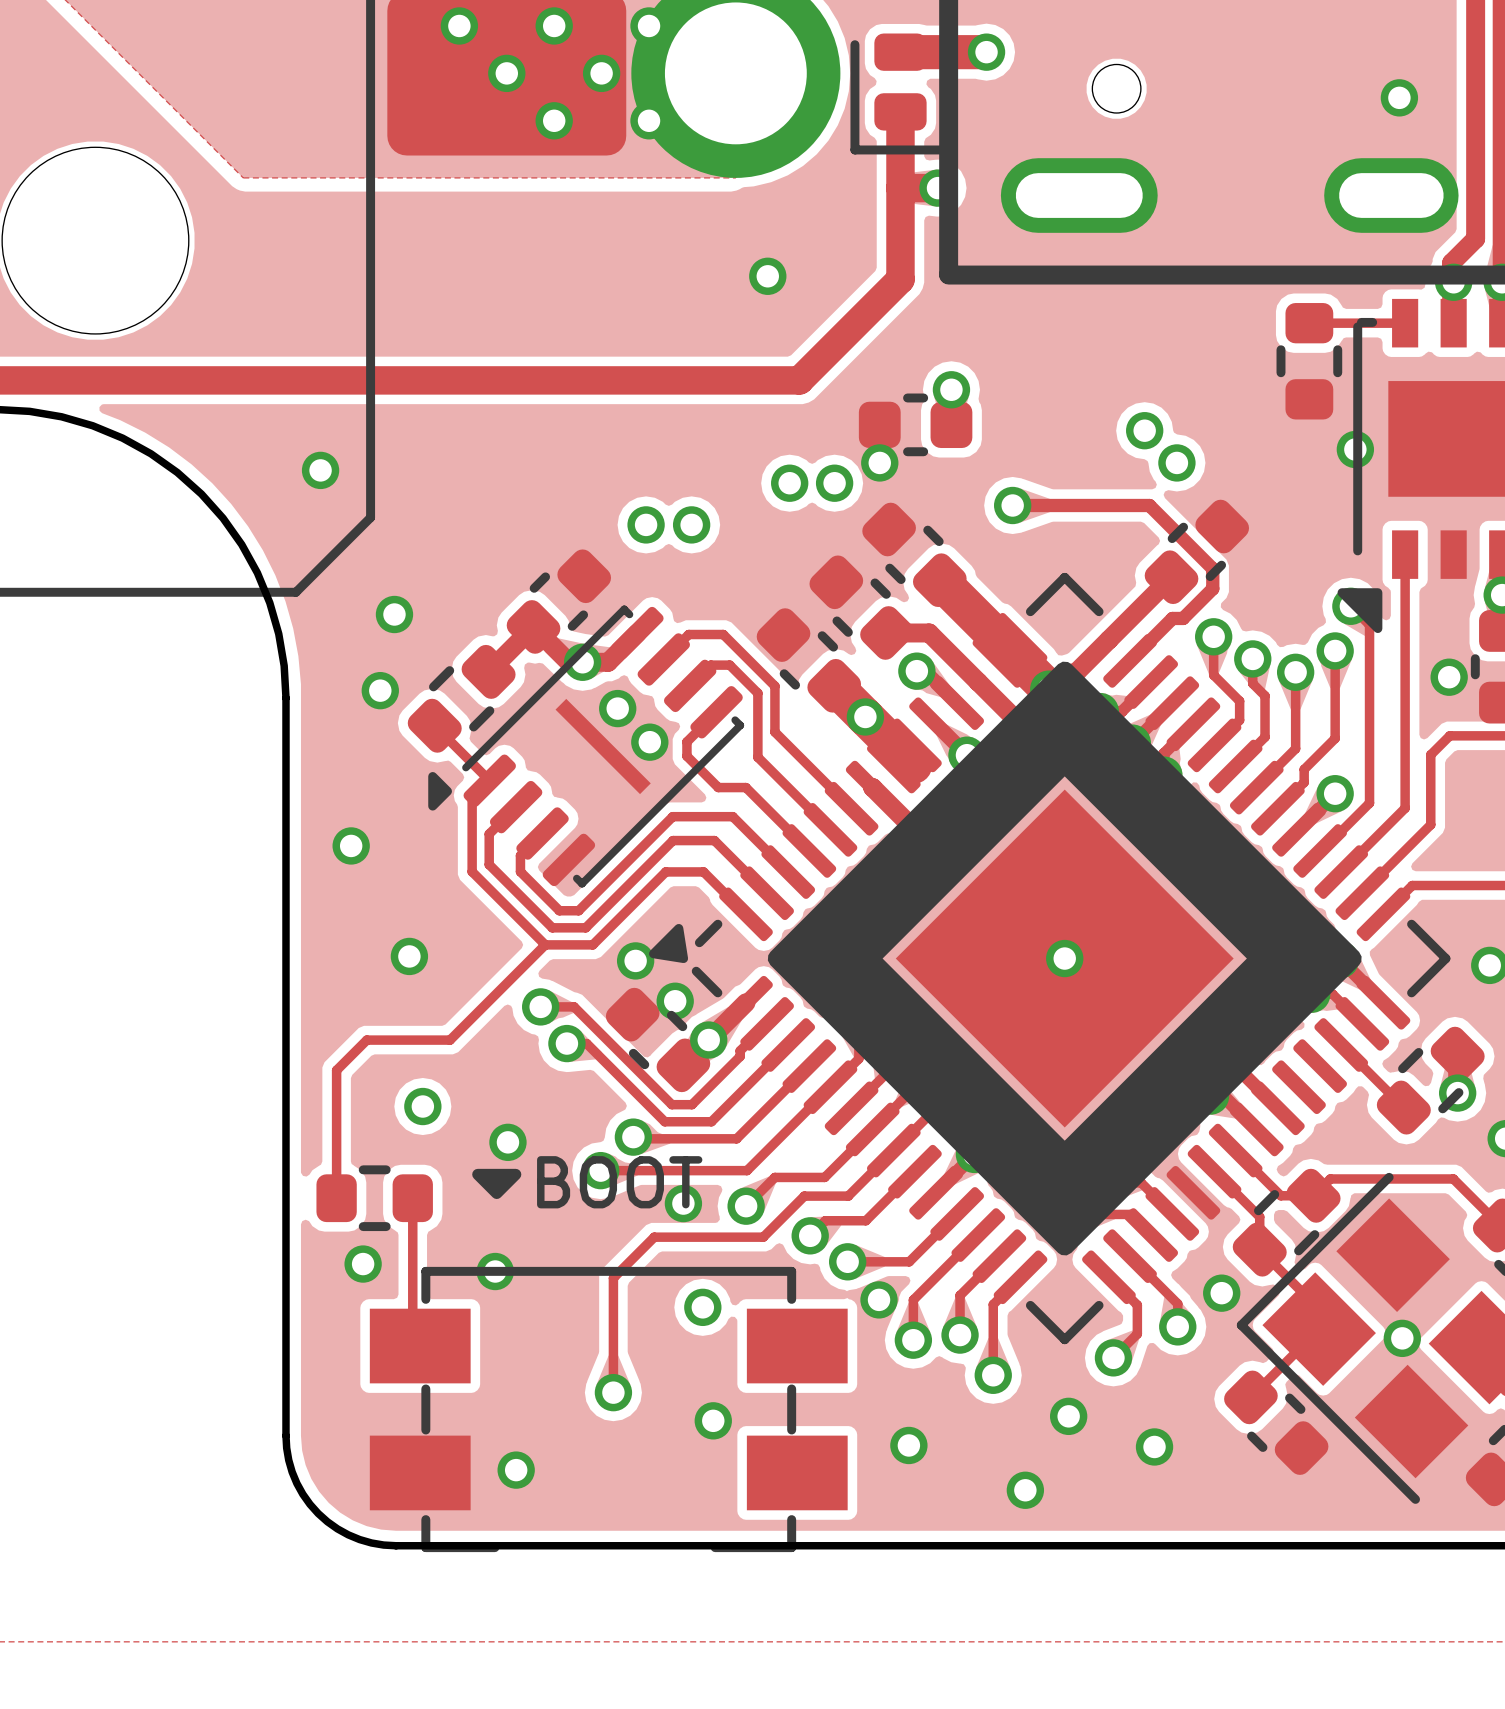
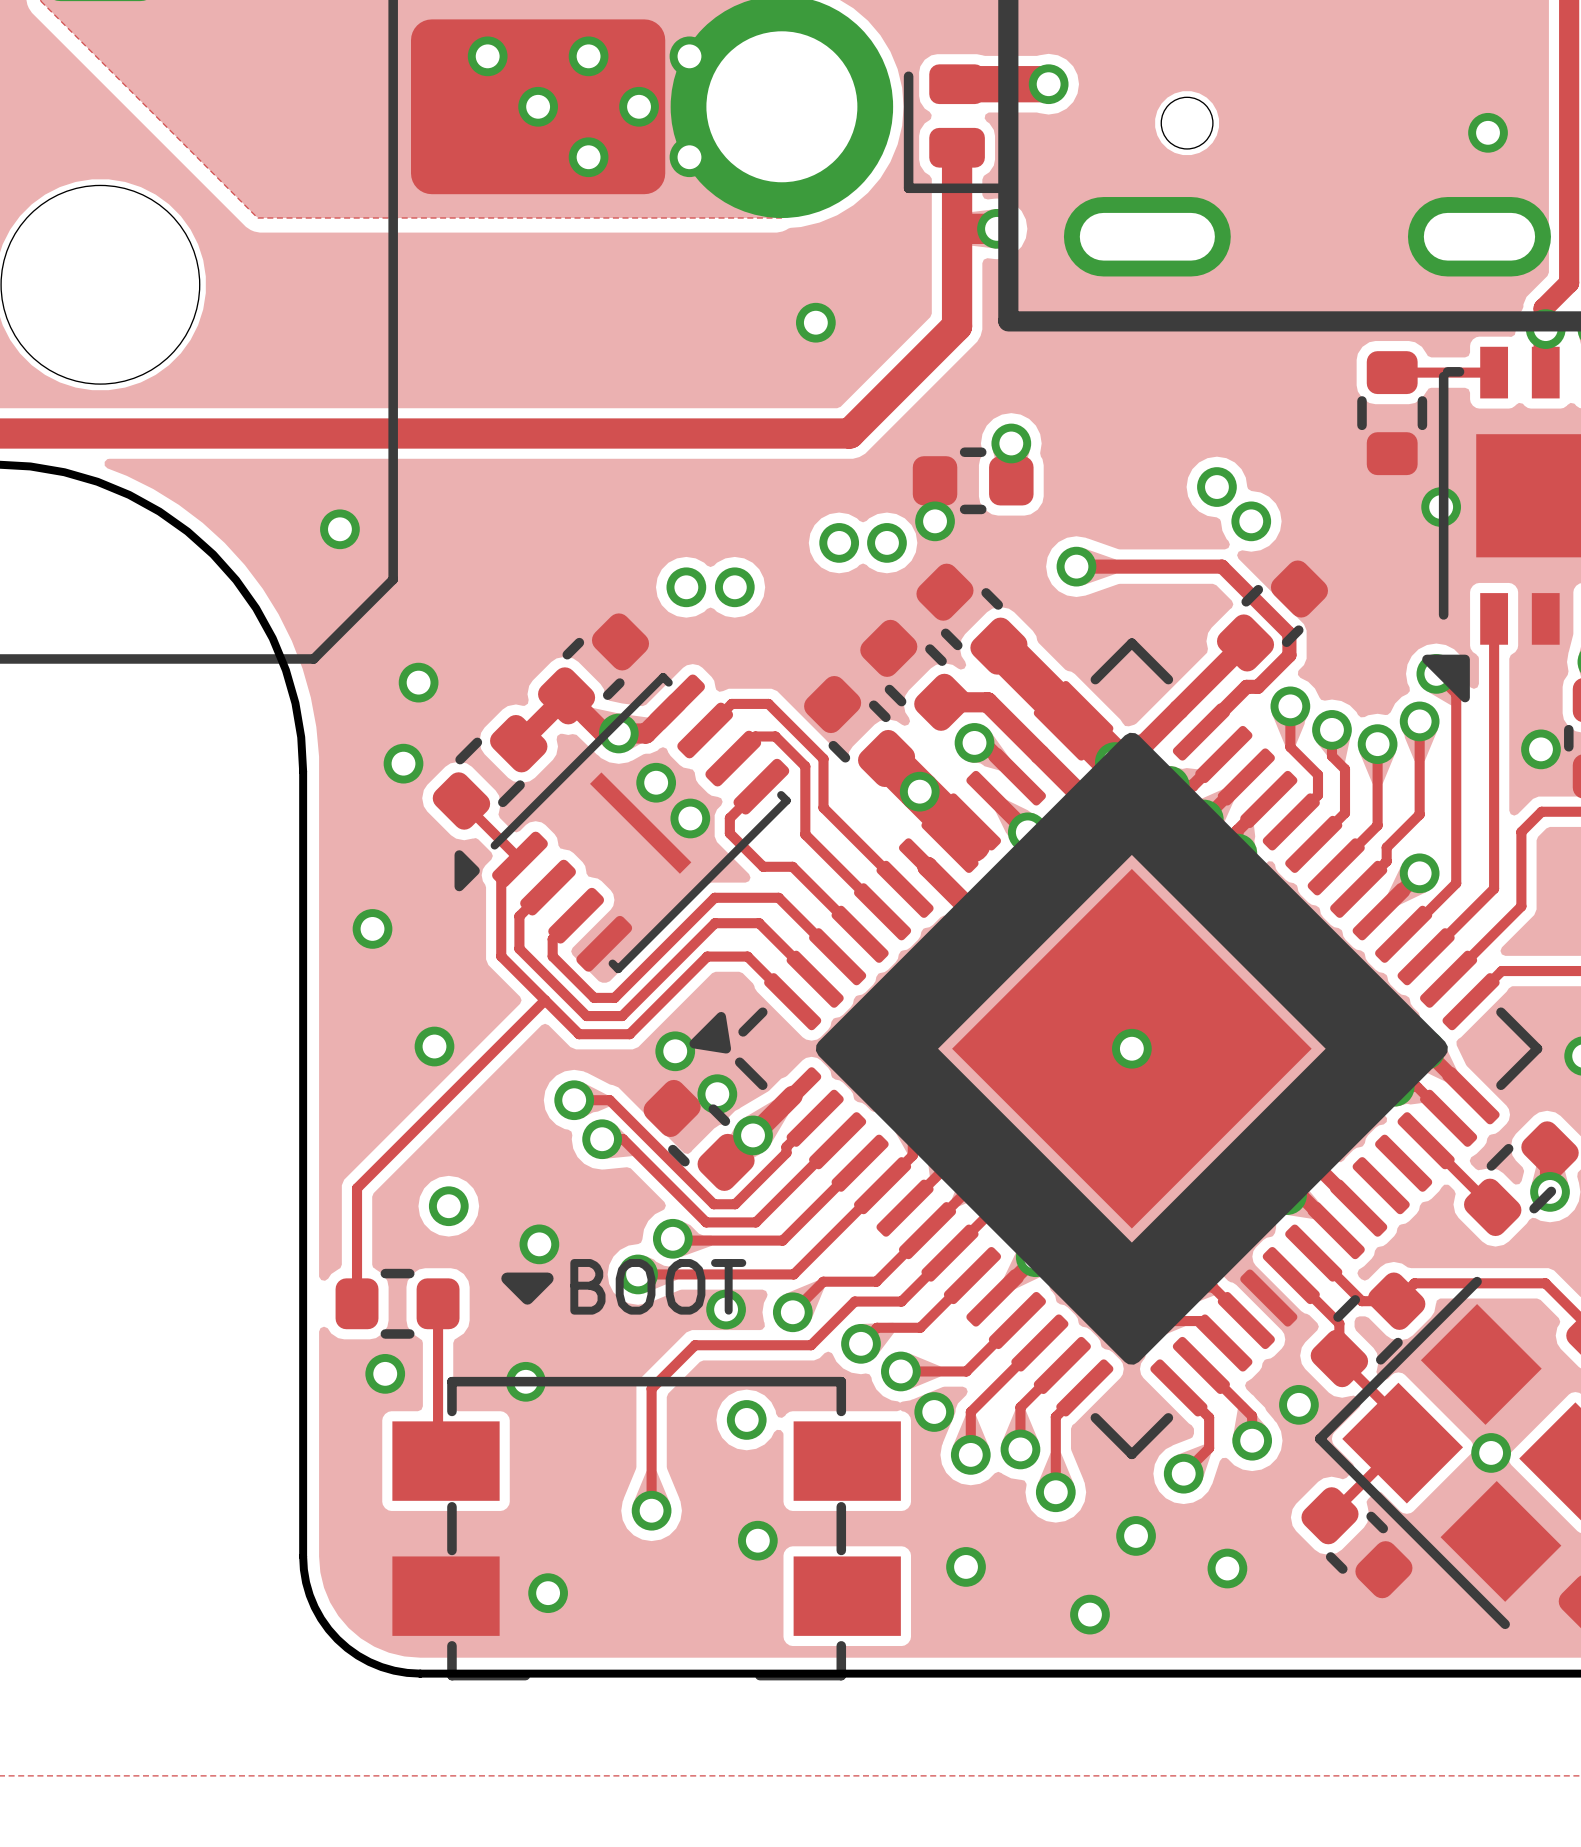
track: (545, 944) (450, 1040) (366, 1040) (336, 1070) (336, 1089) -> (545, 1000) (357, 1188)

